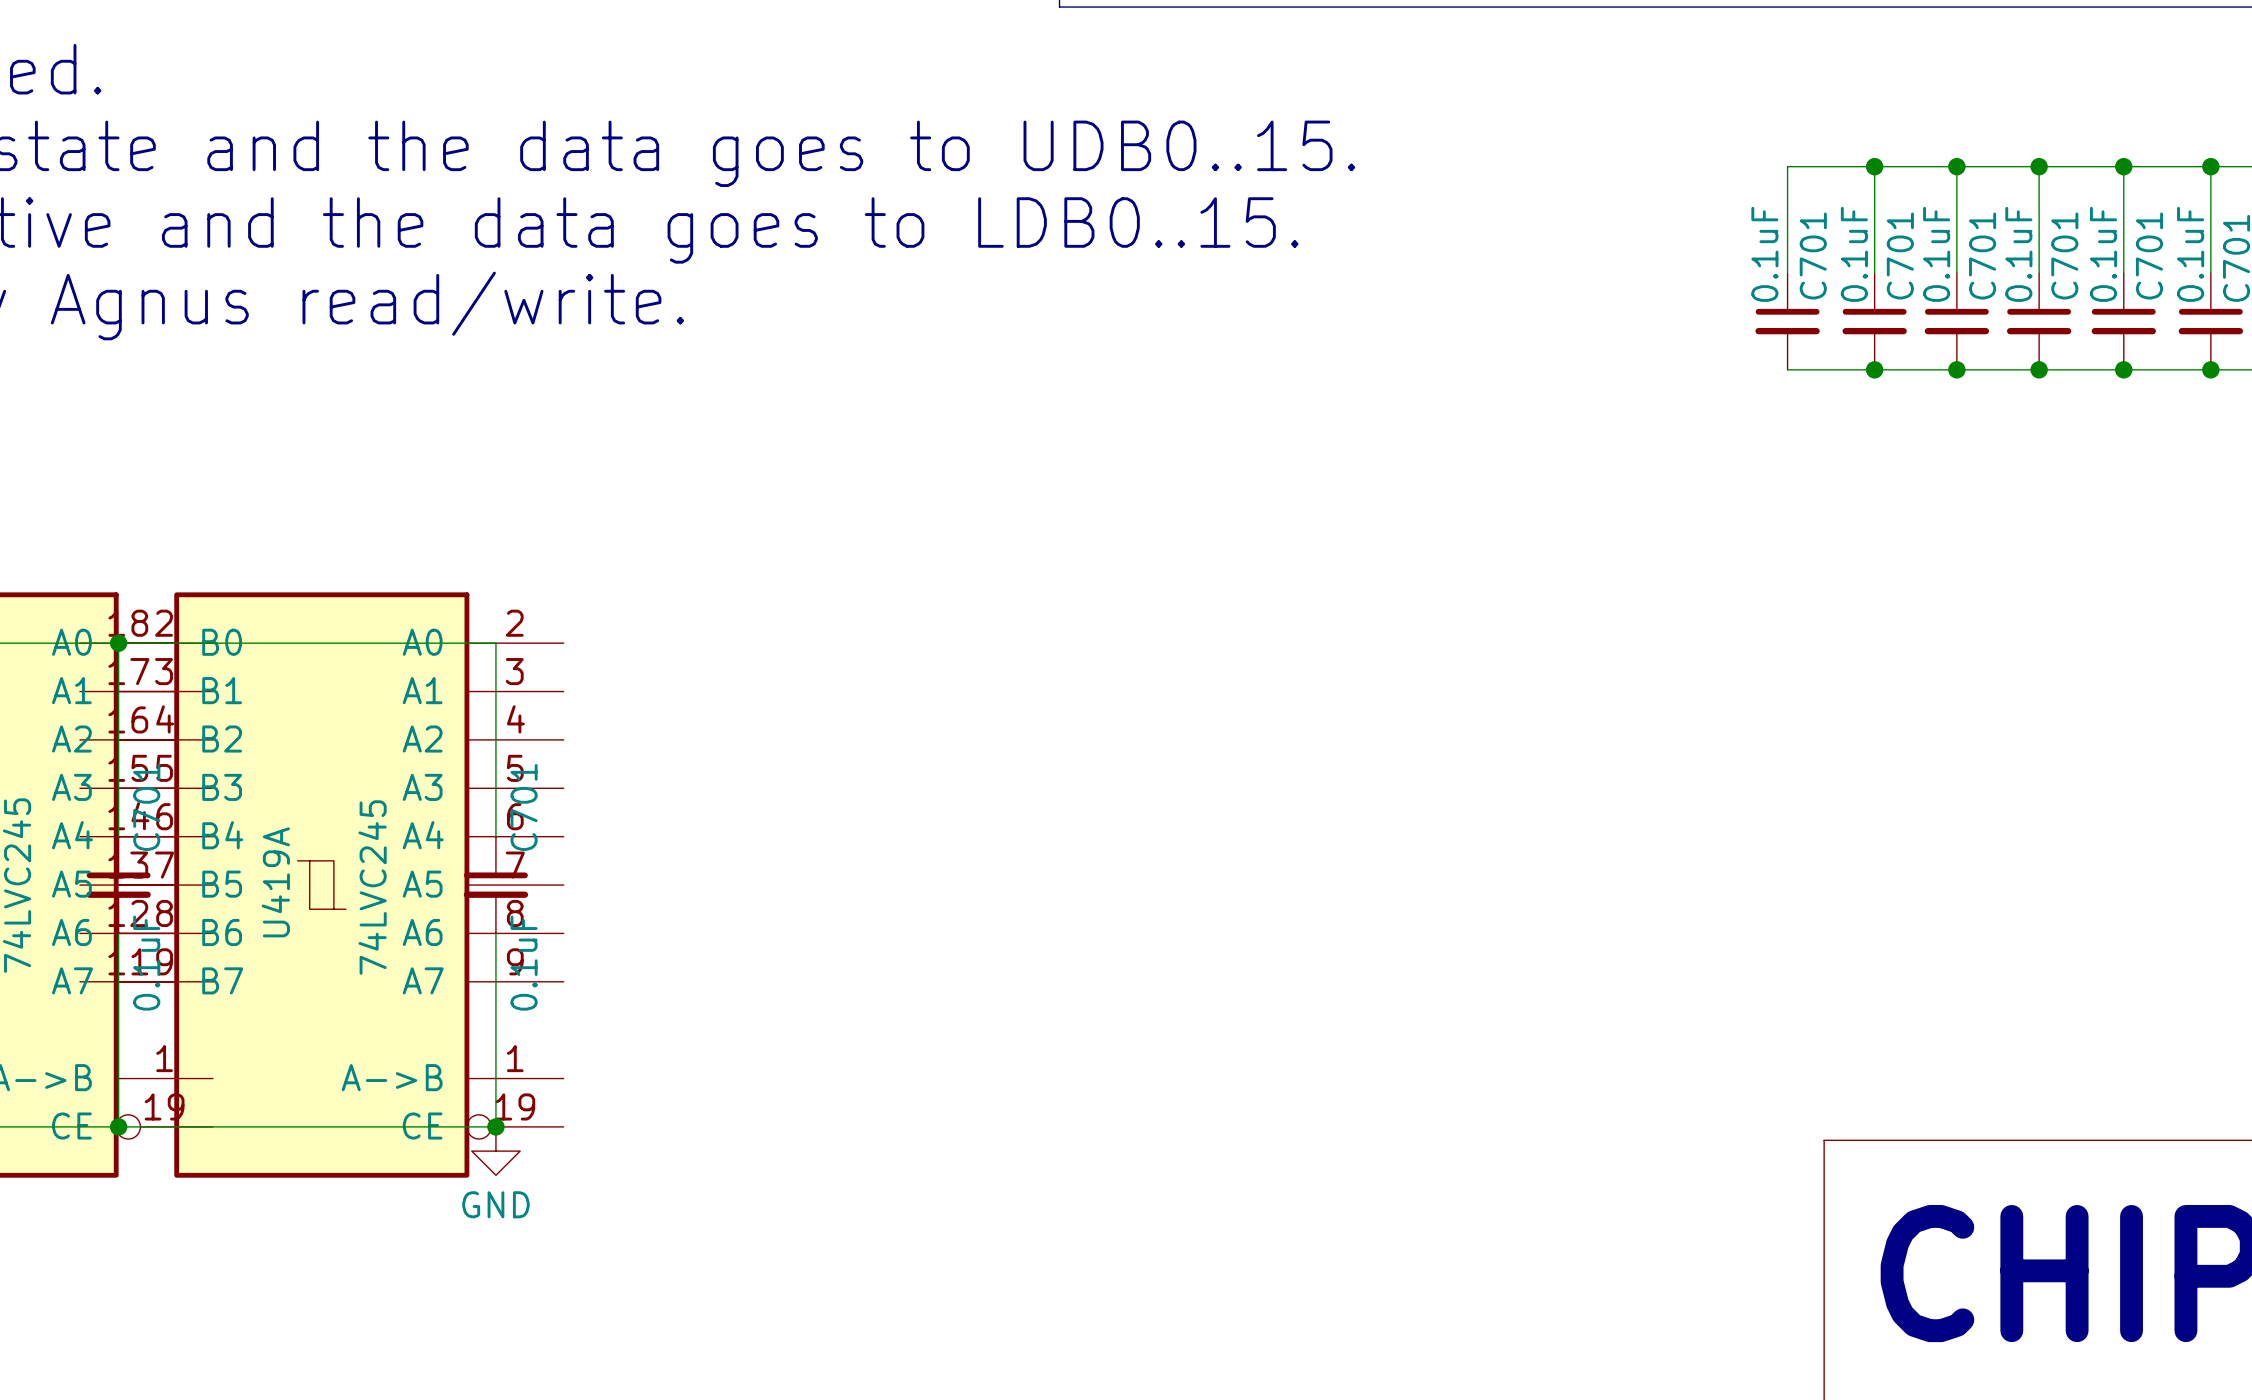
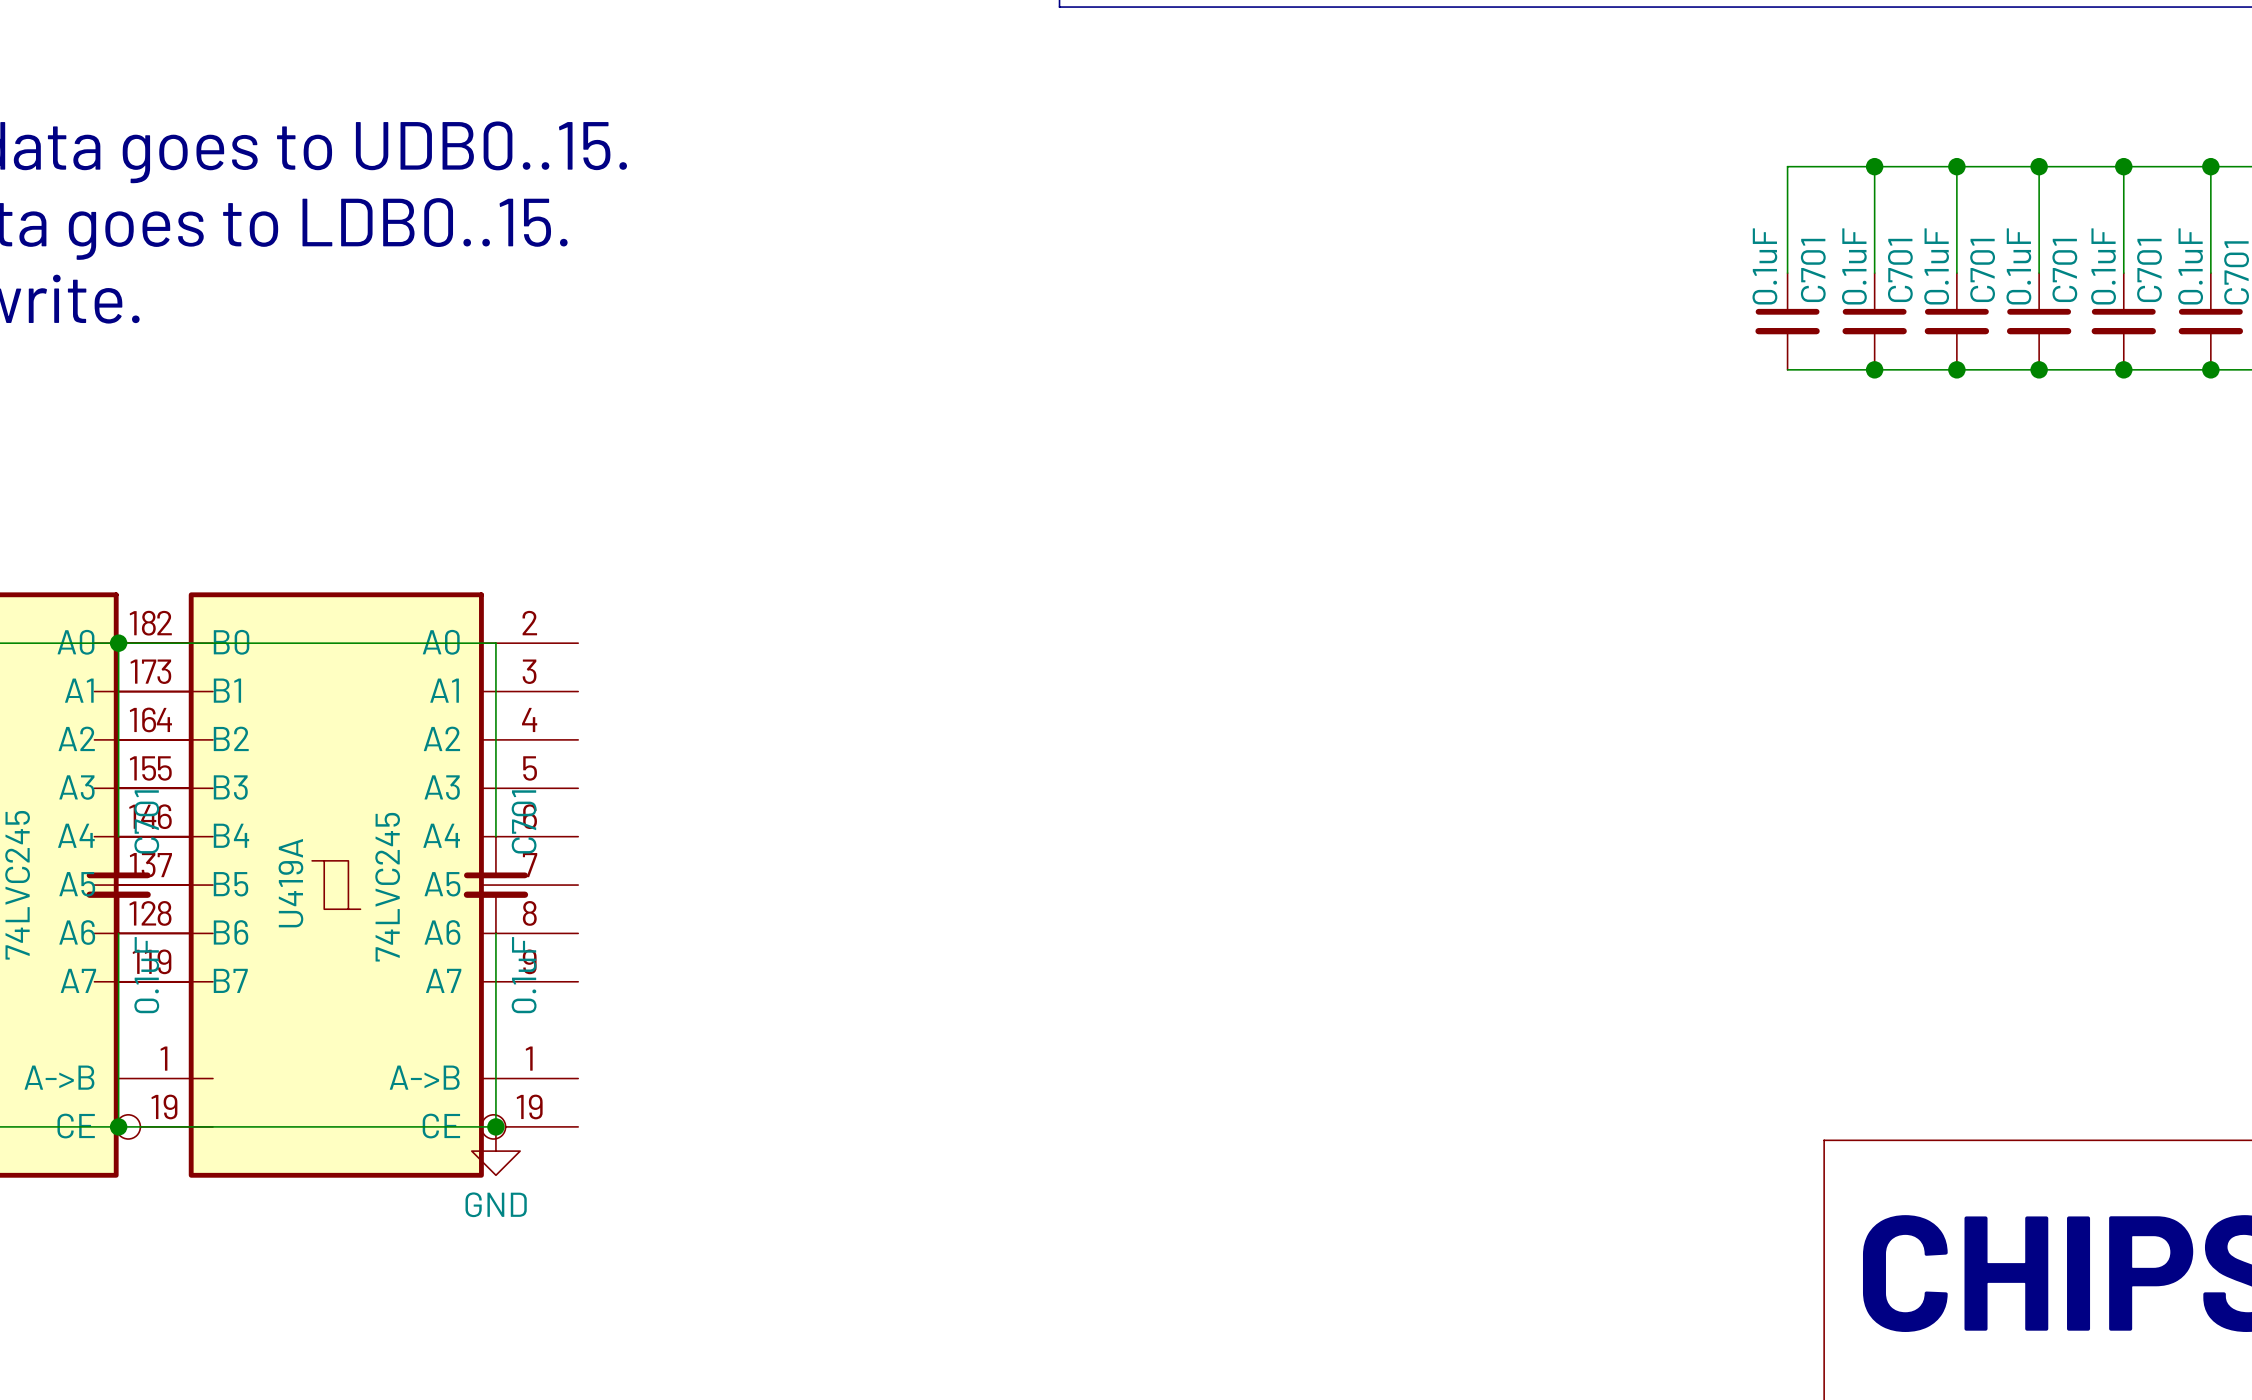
U419A position: (321, 885) -> (336, 885)

